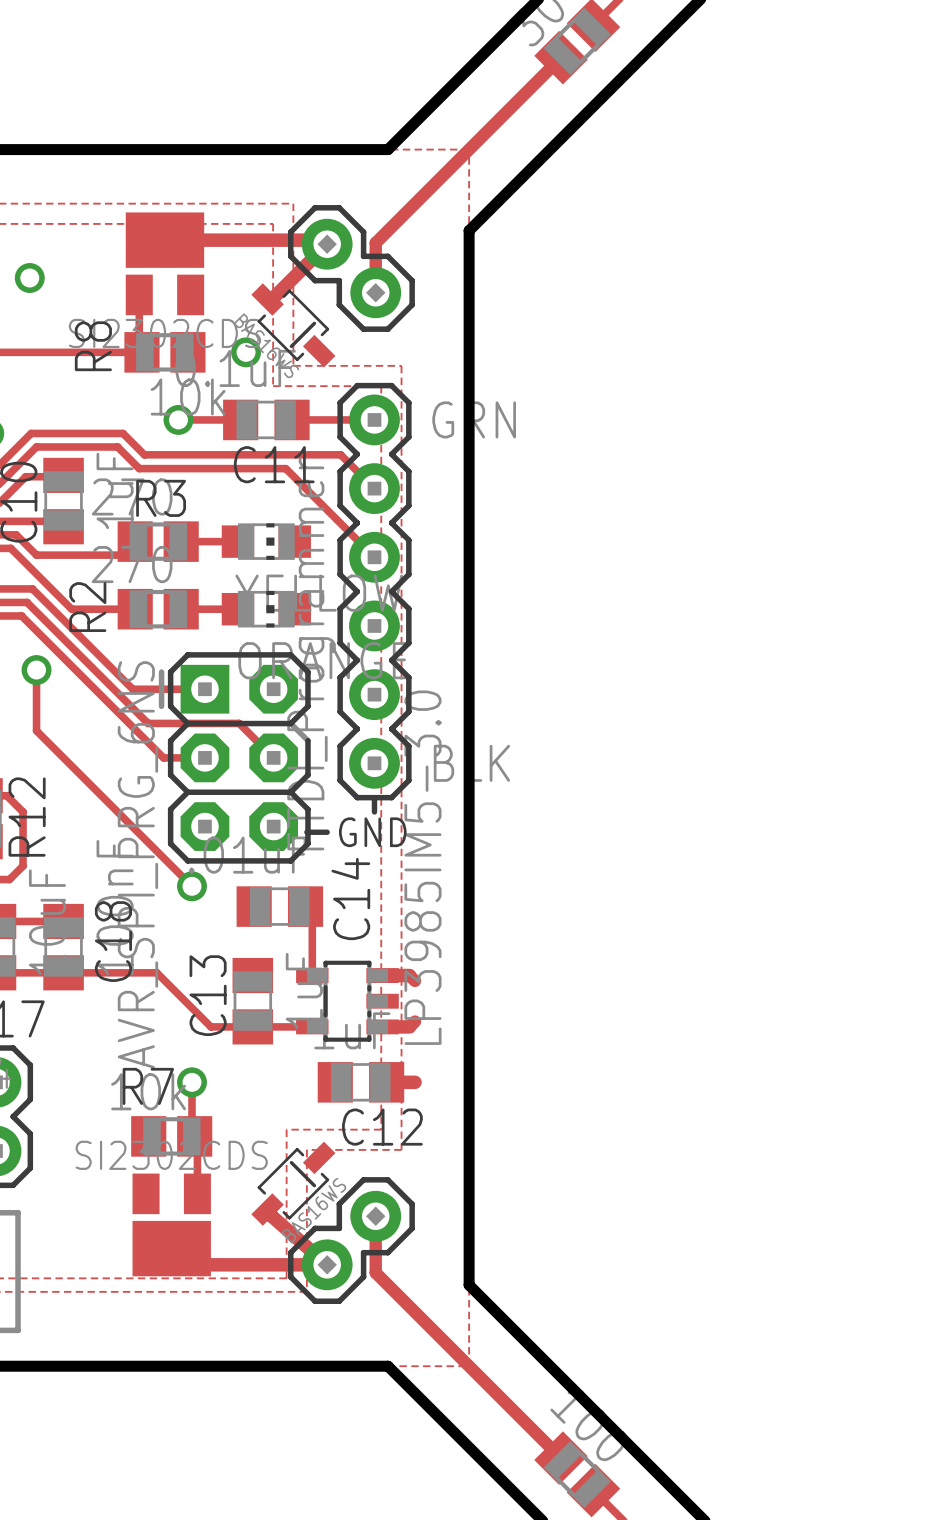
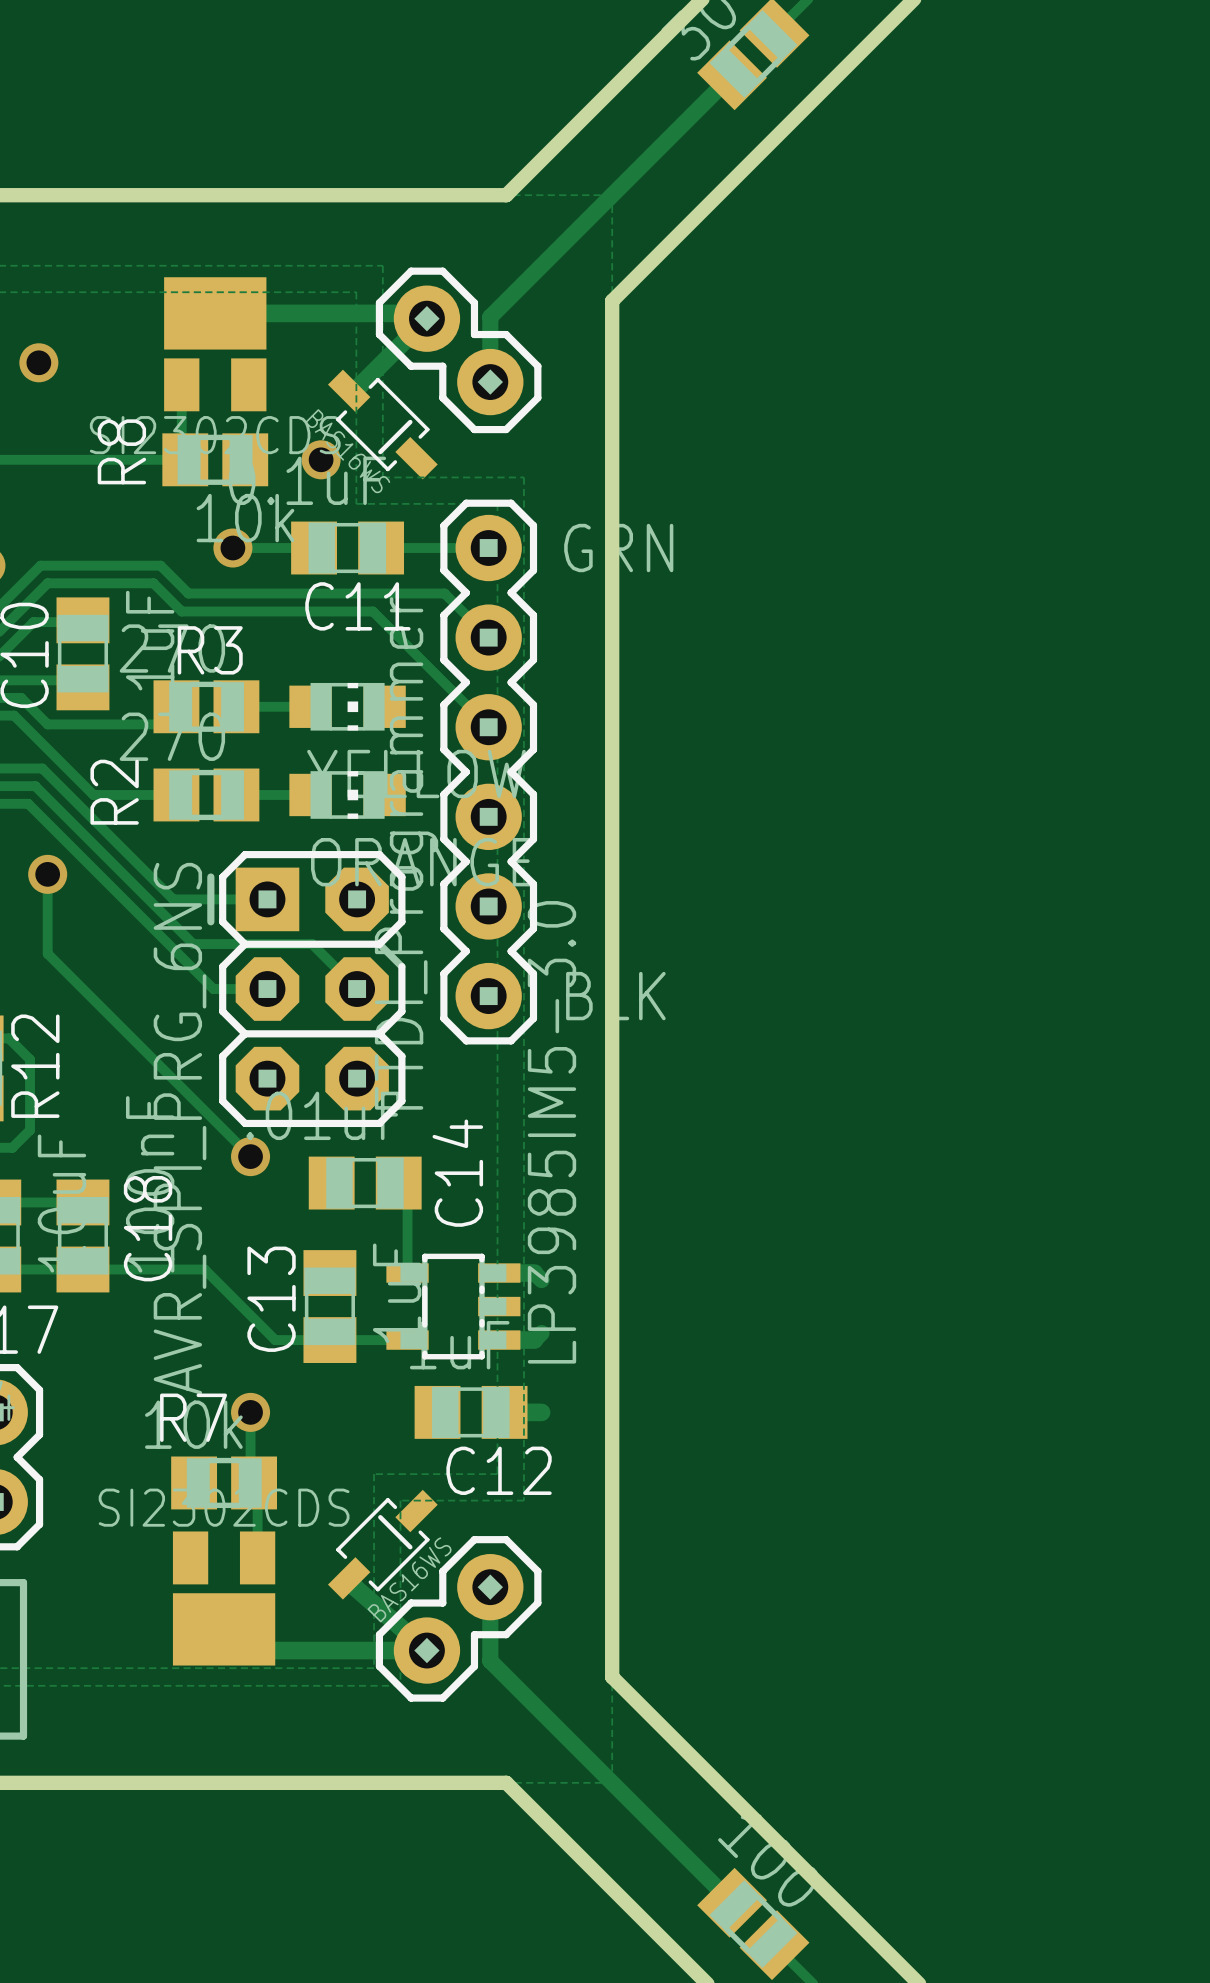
line: (374, 798) (374, 811) -> none
line: (306, 832) (327, 832) -> none
text: GND (372, 832) -> none

